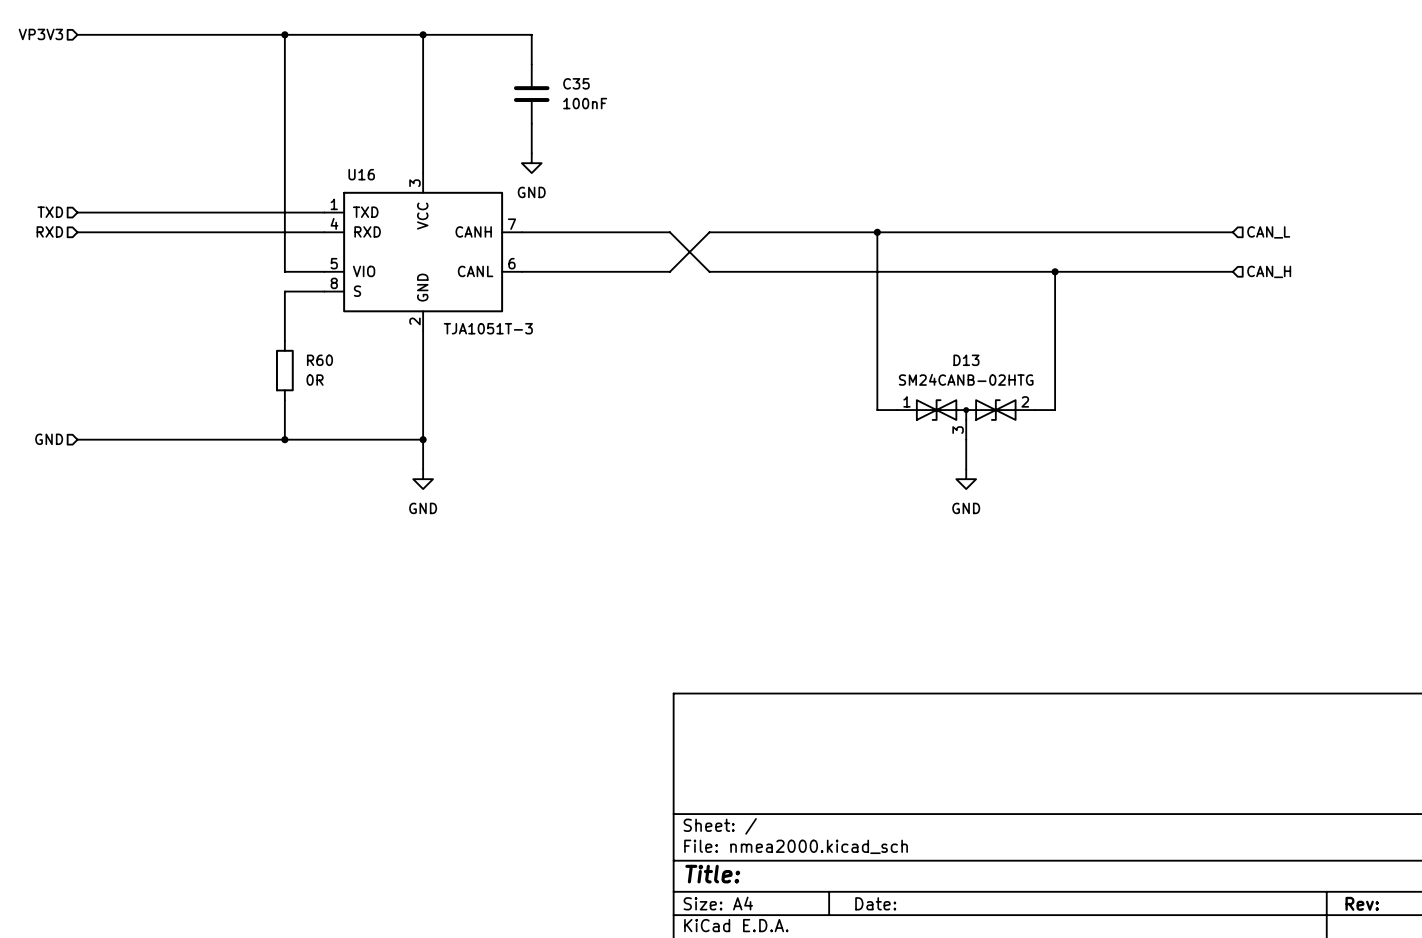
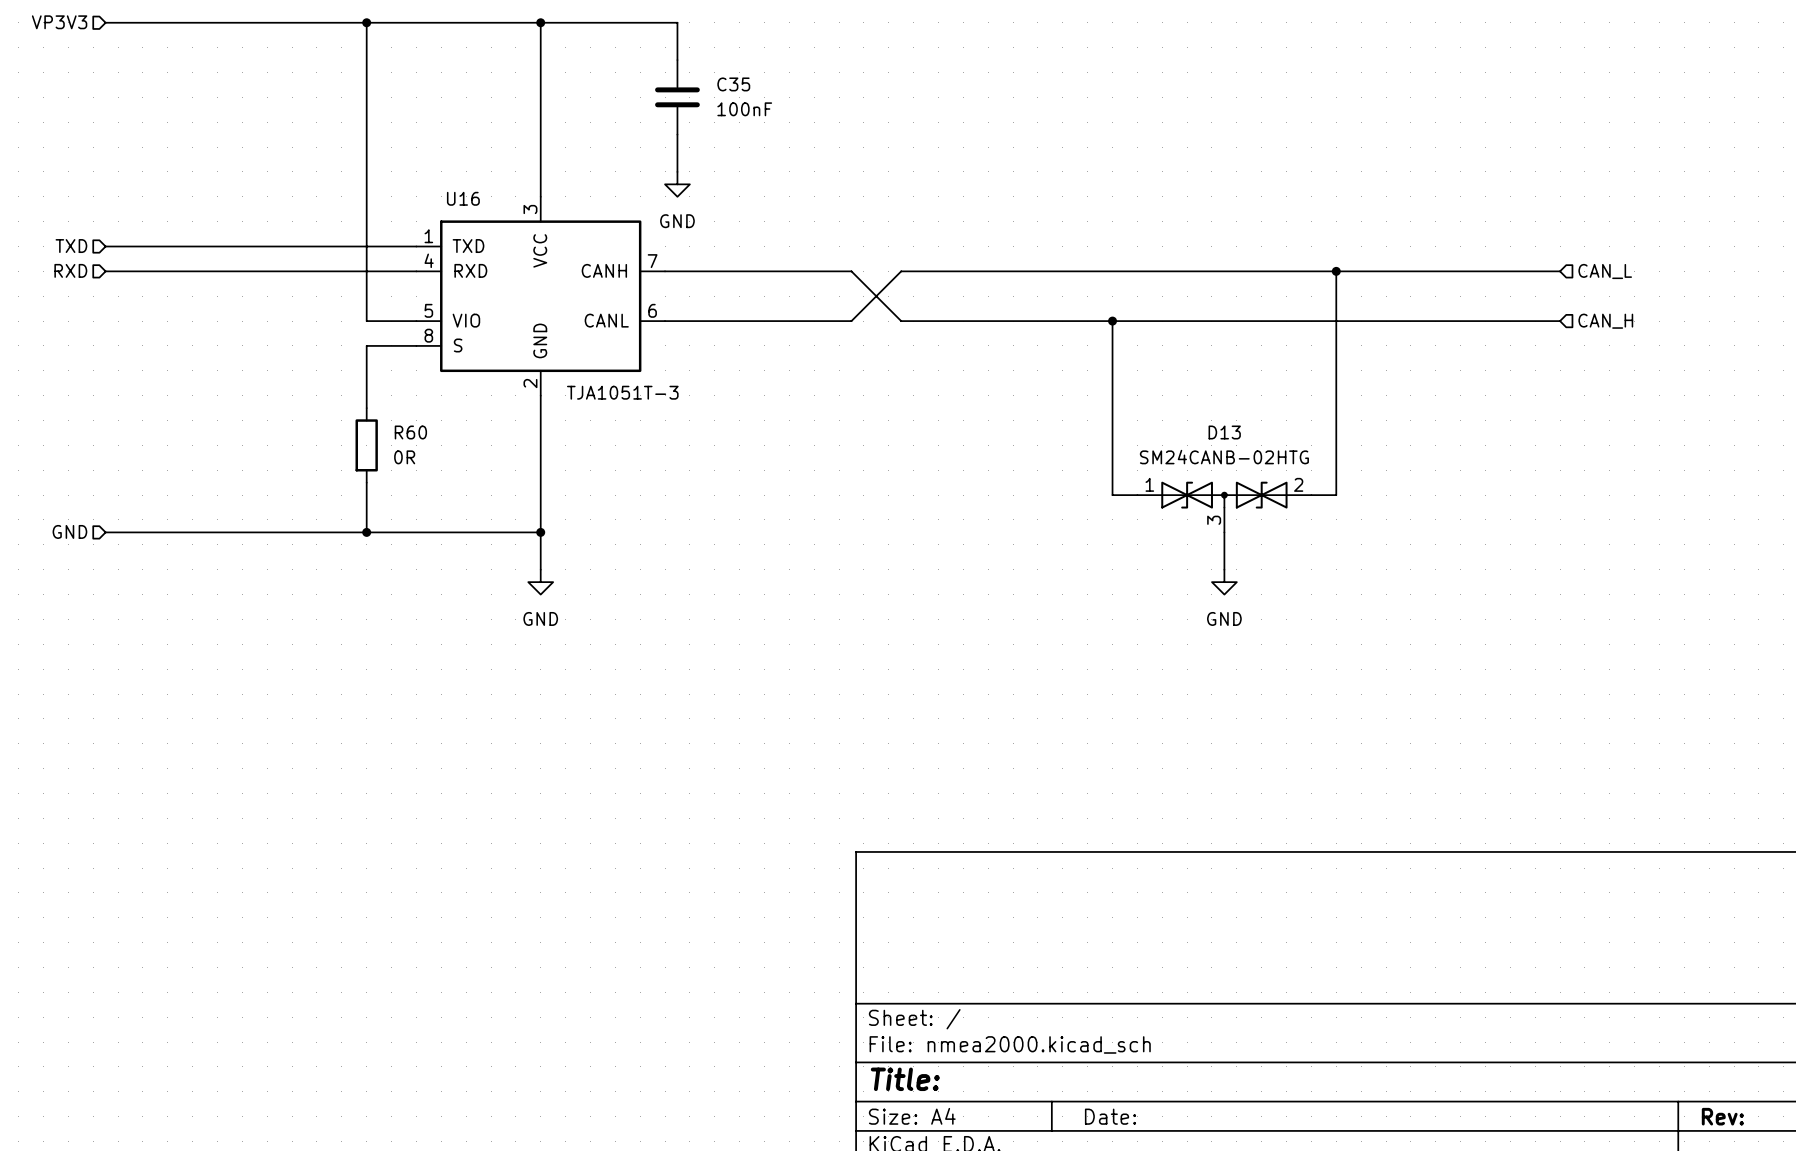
wire: (877, 232) (877, 271) -> (1336, 271) (1336, 321)
junction position: (877, 232) -> (1112, 321)
junction position: (1055, 271) -> (1336, 271)

